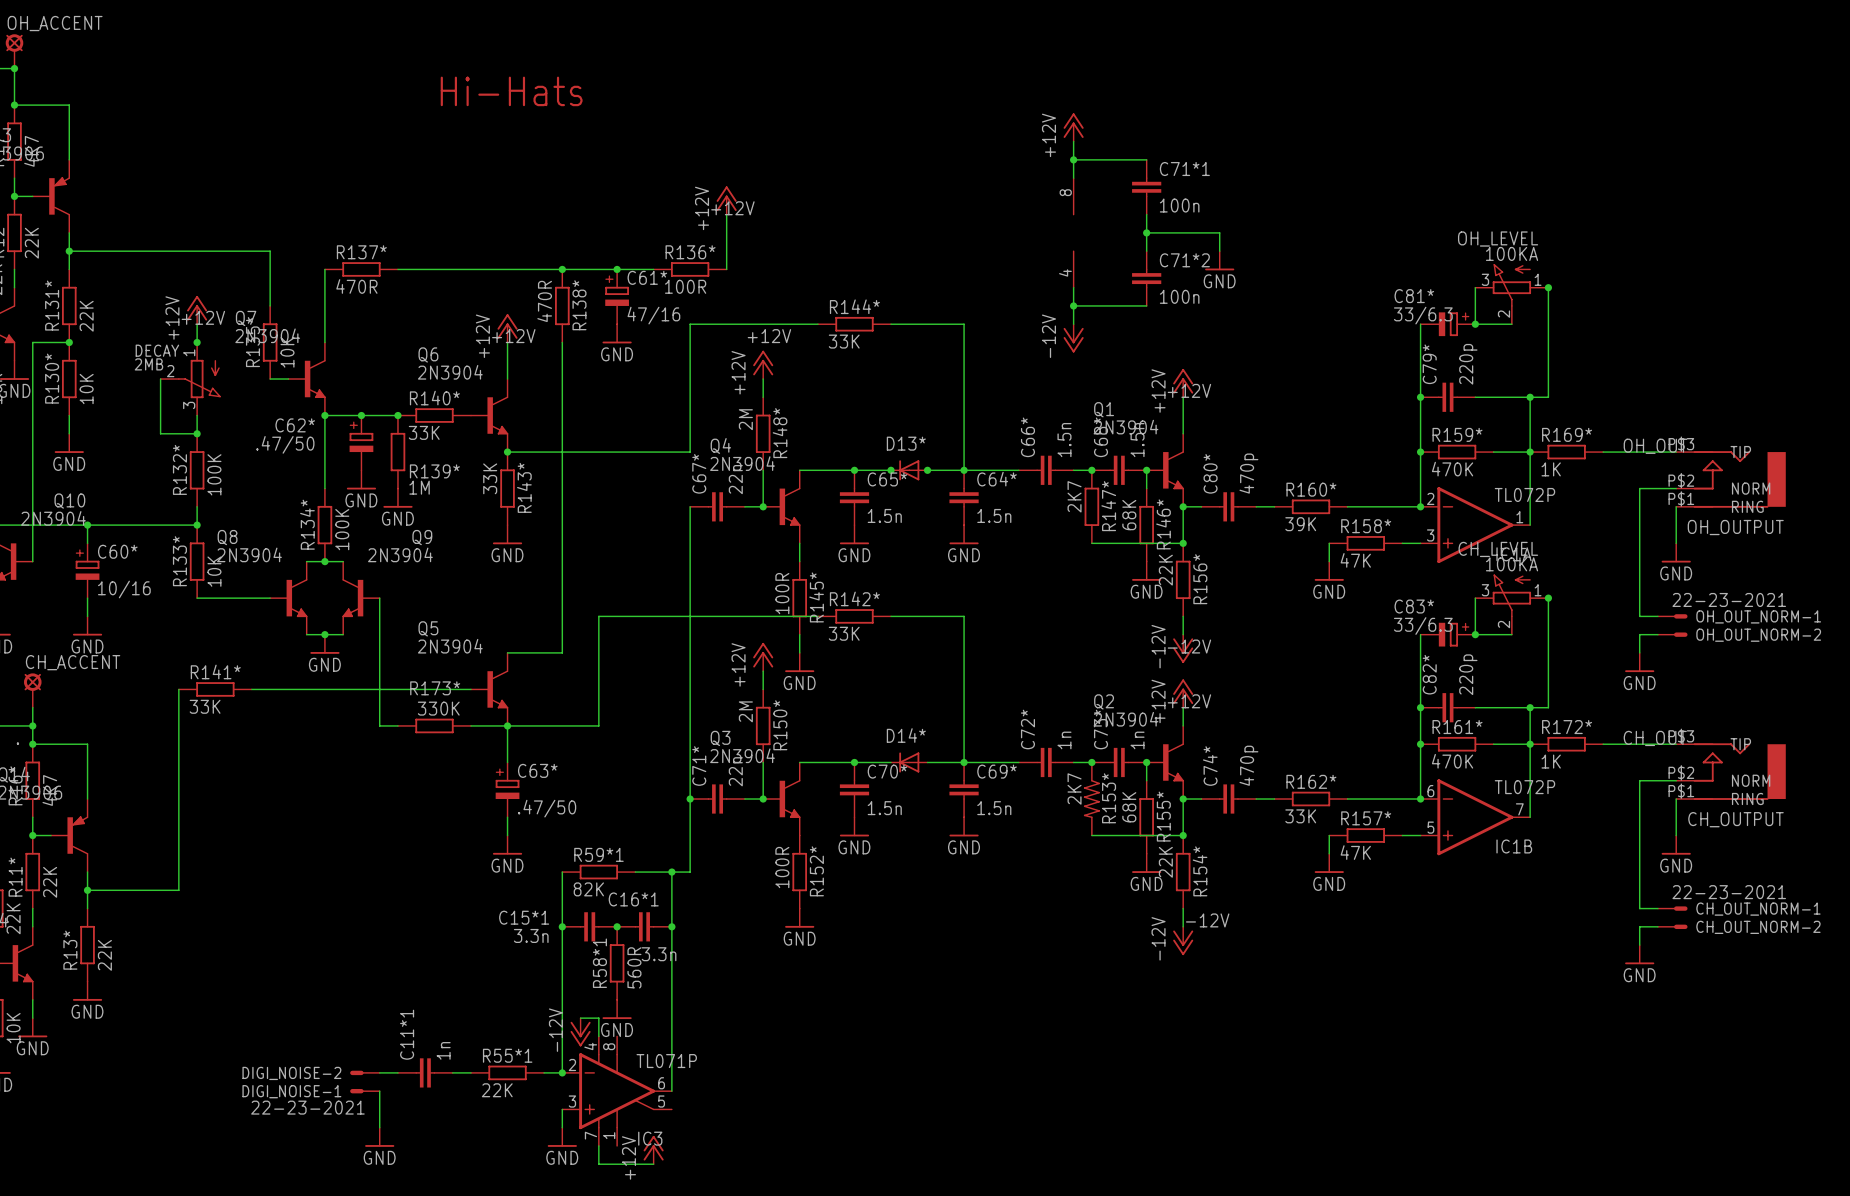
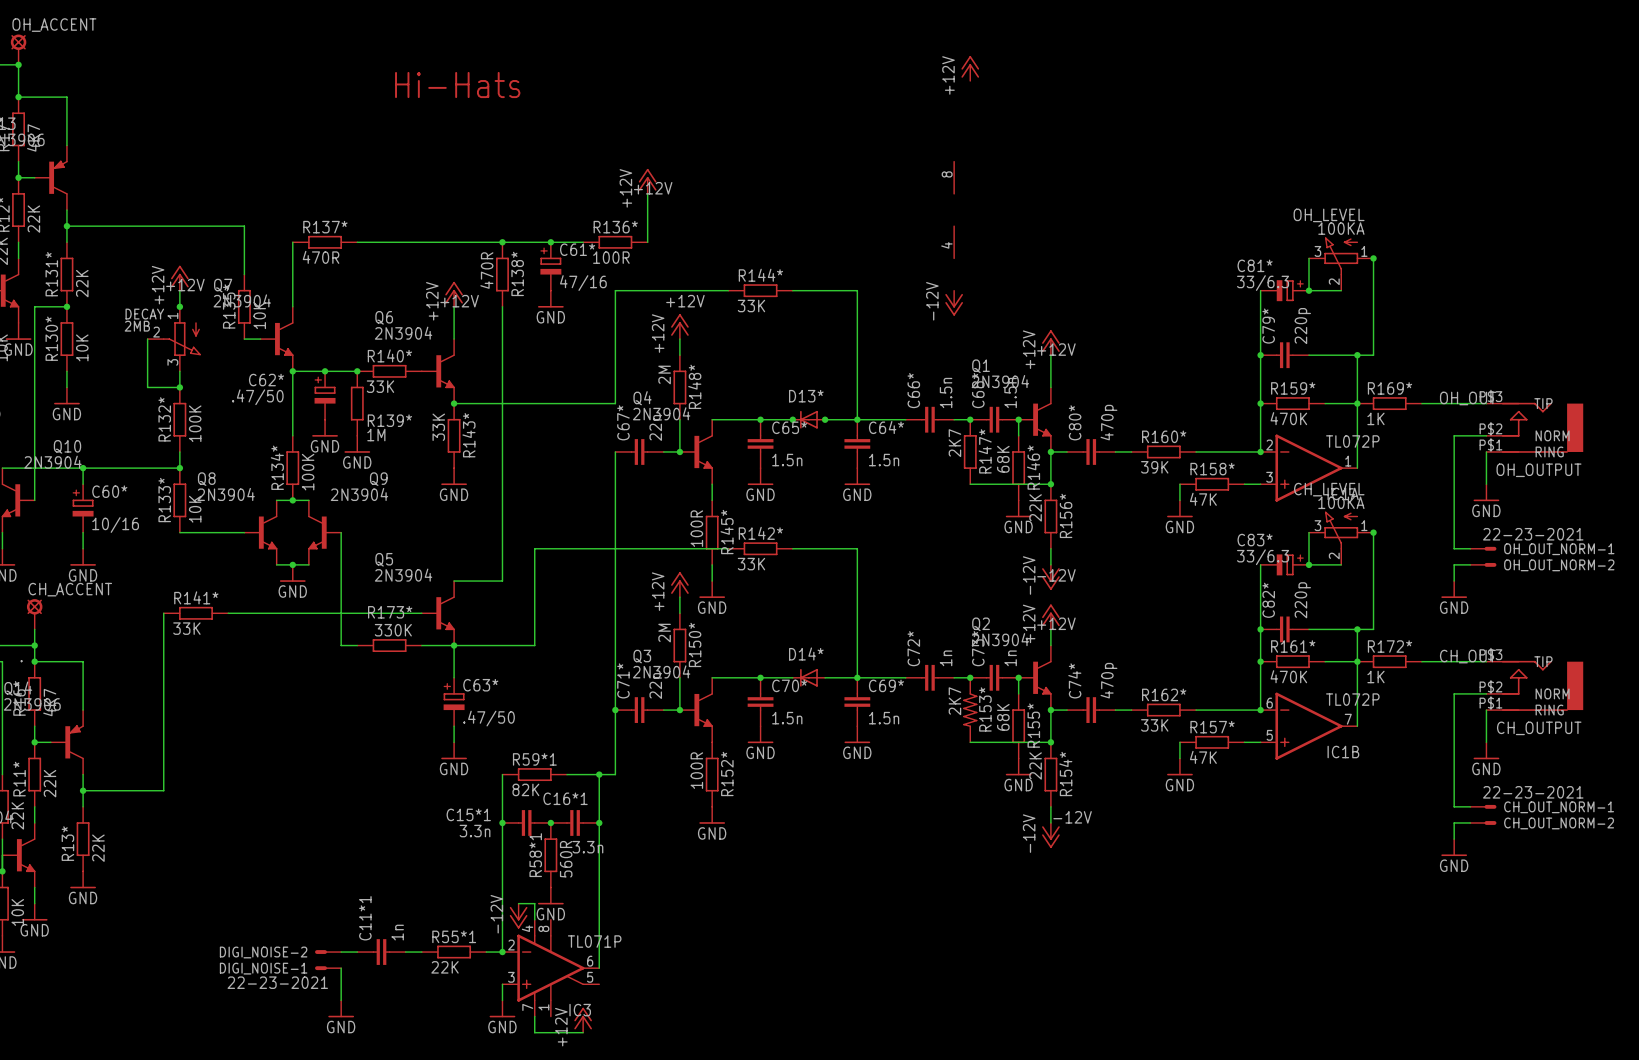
power symbol position: +12V (1073, 127) -> +12V (970, 68)
wire: (1073, 141) (1073, 178) -> none
wire: (1073, 159) (1146, 159) -> none
junction: (1073, 159) -> none
C71*1: 100n (1146, 187) -> none
wire: (1146, 214) (1146, 251) -> none
wire: (1146, 232) (1219, 232) (1219, 251) -> none
junction: (1146, 232) -> none
power symbol: GND (1219, 260) -> none
C71*2: 100n (1146, 278) -> none
wire: (1073, 287) (1073, 324) -> none
wire: (1073, 305) (1146, 305) -> none
junction: (1073, 305) -> none

